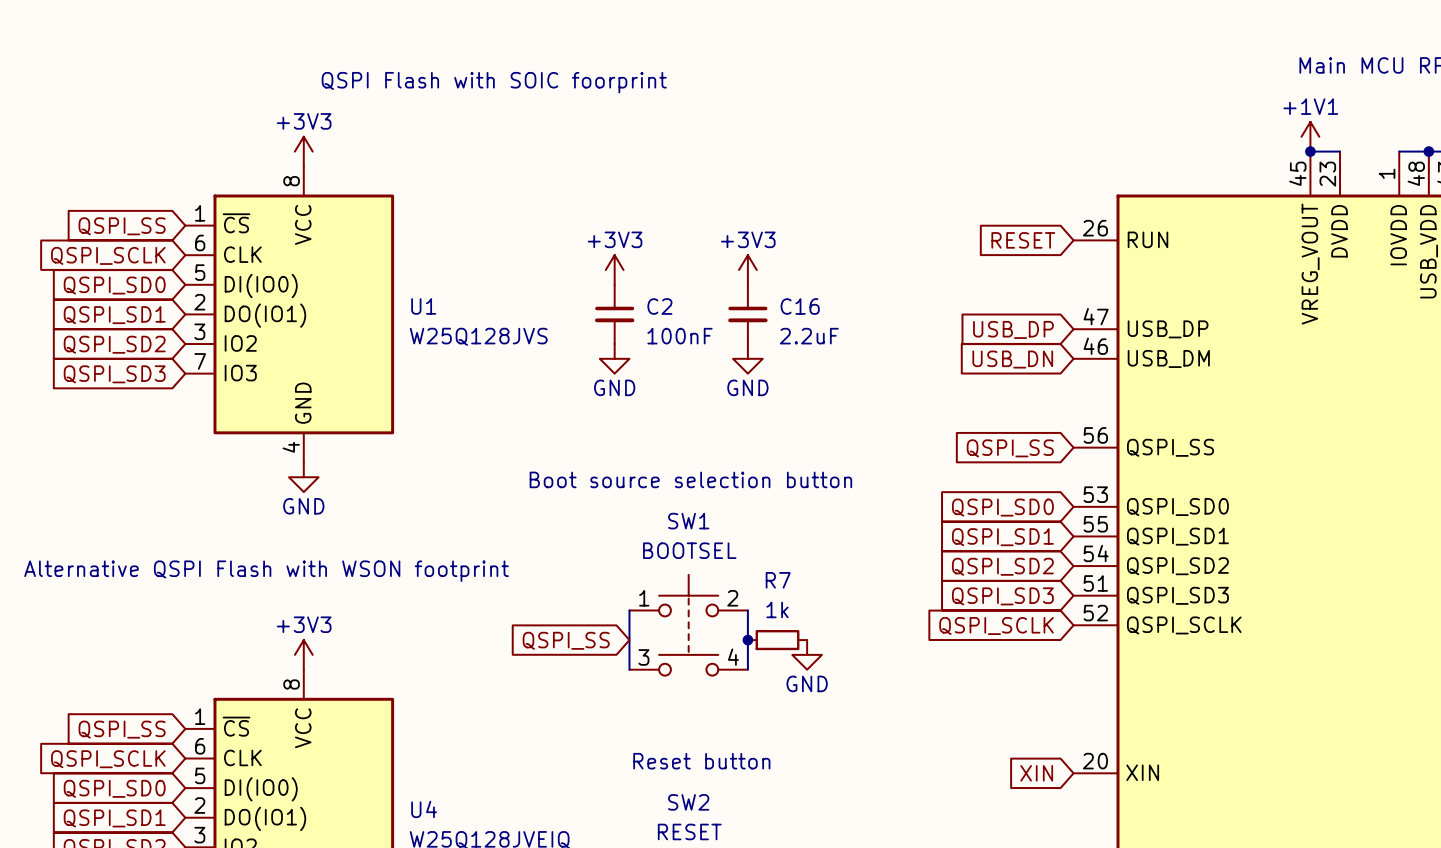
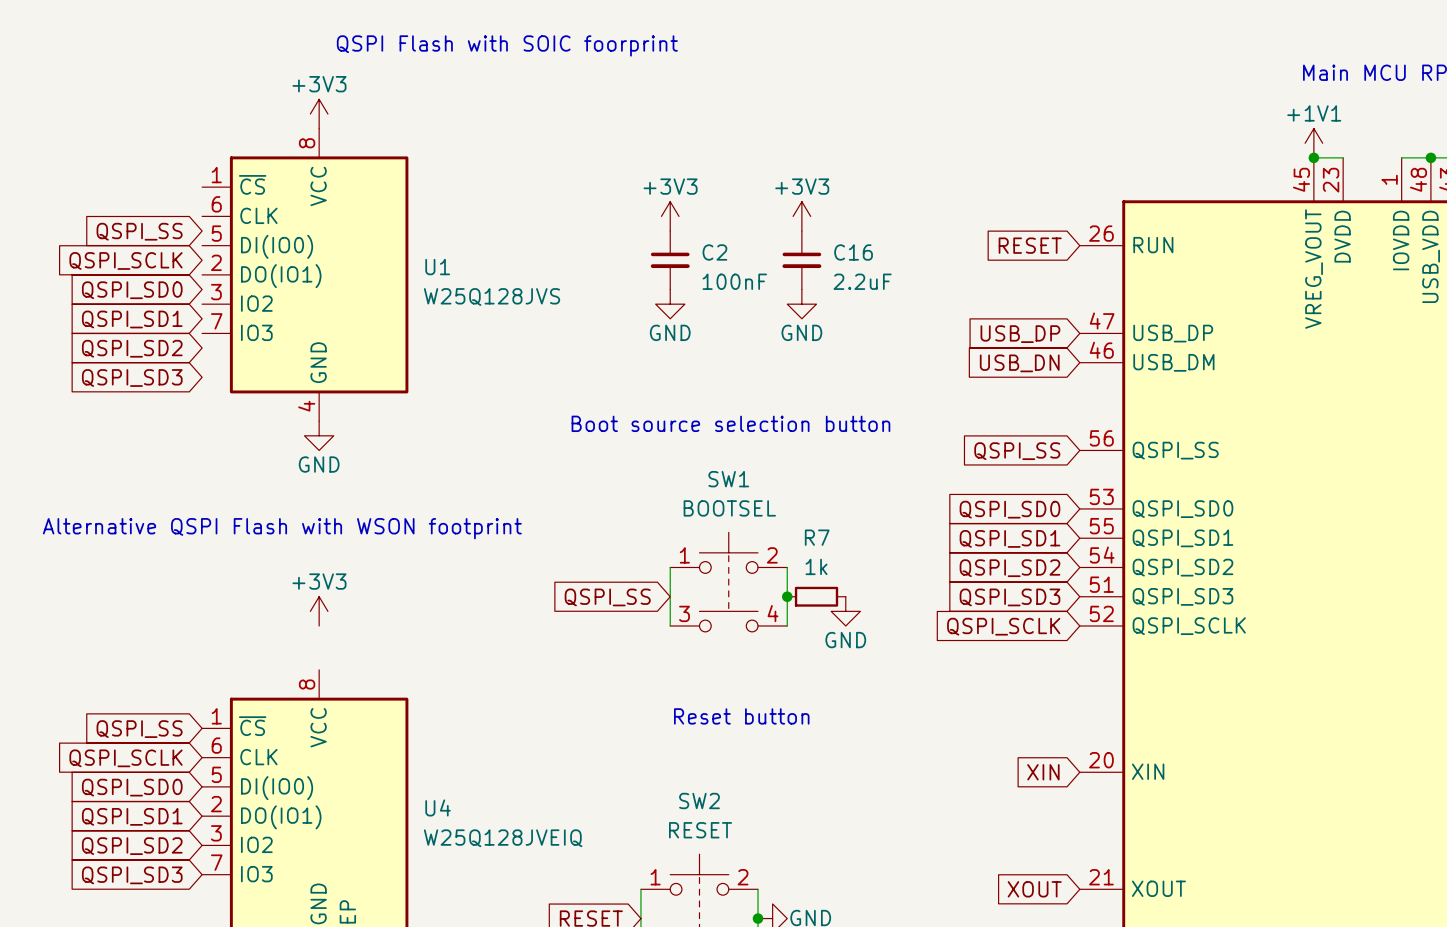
text position: QSPI Flash with SOIC foorprint (494, 82) -> QSPI Flash with SOIC foorprint (507, 45)
power symbol position: +3V3 (303, 151) -> +3V3 (319, 113)
power symbol: none -> +3V3 (670, 216)
power symbol: none -> +3V3 (801, 216)
power symbol: +3V3 (614, 270) -> none
power symbol: +3V3 (747, 270) -> none
power symbol: none -> GND (670, 304)
power symbol: none -> GND (801, 304)
U1 position: (289, 314) -> (305, 274)
C2 position: (614, 314) -> (670, 260)
C16 position: (747, 314) -> (801, 260)
power symbol: GND (614, 358) -> none
power symbol: GND (747, 358) -> none
power symbol position: GND (303, 477) -> GND (319, 435)
text position: Boot source selection button (690, 479) -> Boot source selection button (730, 423)
text position: Alternative QSPI Flash with WSON footprint (266, 571) -> Alternative QSPI Flash with WSON footprint (282, 528)
wire: (629, 610) (629, 669) -> (670, 567) (670, 625)
wire: (747, 610) (747, 669) -> (787, 567) (787, 625)
SW1 position: (688, 625) -> (728, 582)
global label position: QSPI_SS (566, 640) -> QSPI_SS (607, 597)
junction position: (747, 640) -> (787, 596)
R7 position: (777, 640) -> (816, 596)
power symbol position: +3V3 (303, 654) -> +3V3 (319, 611)
power symbol position: GND (807, 654) -> GND (845, 611)
text position: Reset button (701, 761) -> Reset button (741, 716)

